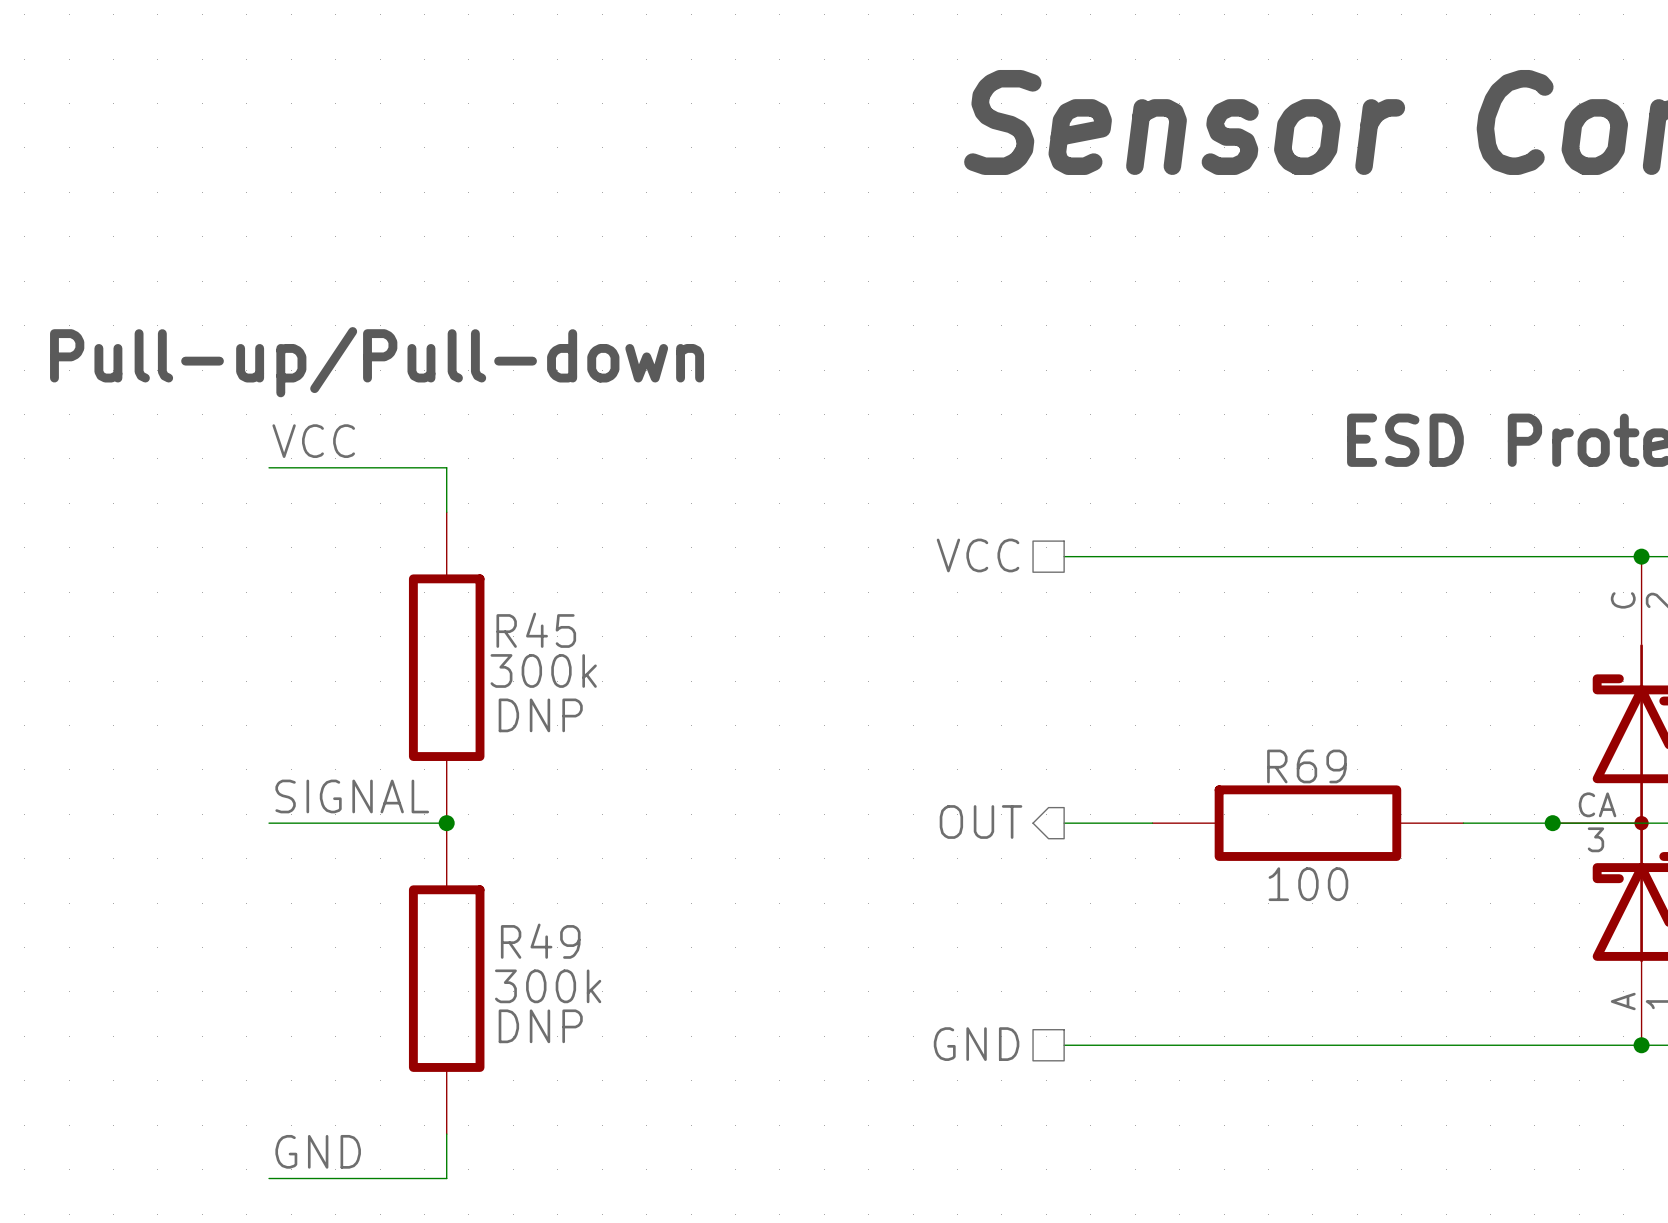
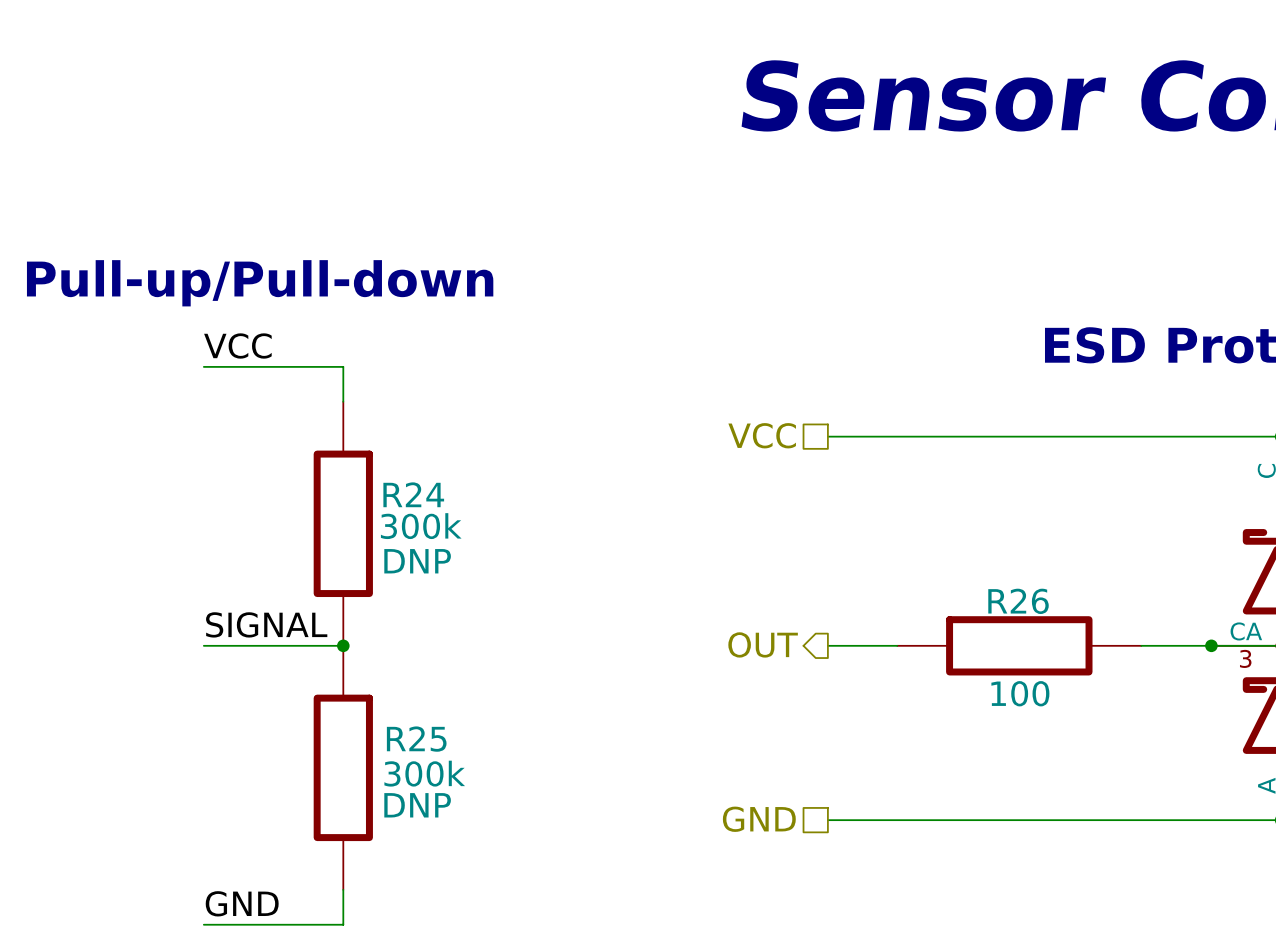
R45 name: R45 (536, 630) -> R24 (413, 494)
R69 name: R69 (1306, 766) -> R26 (1018, 601)
R49 name: R49 (540, 941) -> R25 (416, 739)

